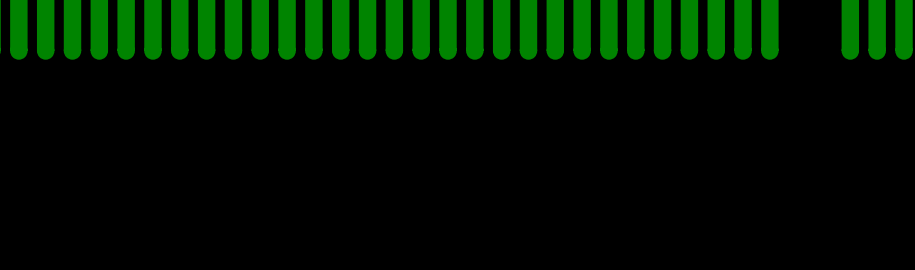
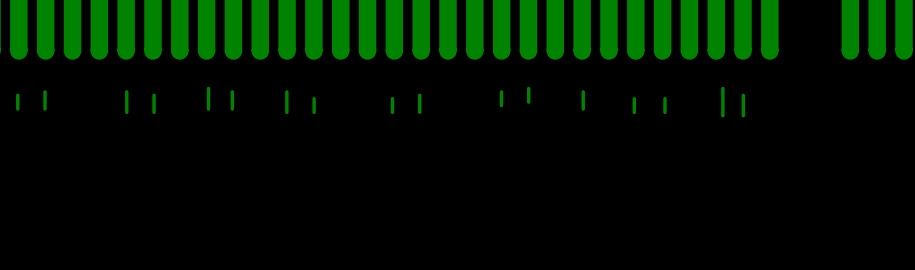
track: none -> (208, 88) (208, 108)
track: none -> (528, 88) (528, 102)
track: none -> (722, 88) (722, 115)
track: none -> (45, 91) (45, 108)
track: none -> (126, 91) (126, 112)
track: none -> (232, 91) (232, 108)
track: none -> (286, 91) (286, 112)
track: none -> (501, 91) (501, 105)
track: none -> (583, 91) (583, 108)
track: none -> (17, 95) (17, 108)
track: none -> (154, 95) (154, 112)
track: none -> (419, 95) (419, 112)
track: none -> (743, 95) (743, 115)
track: none -> (314, 98) (314, 112)
track: none -> (392, 98) (392, 112)
track: none -> (634, 98) (634, 112)
track: none -> (664, 98) (664, 112)

